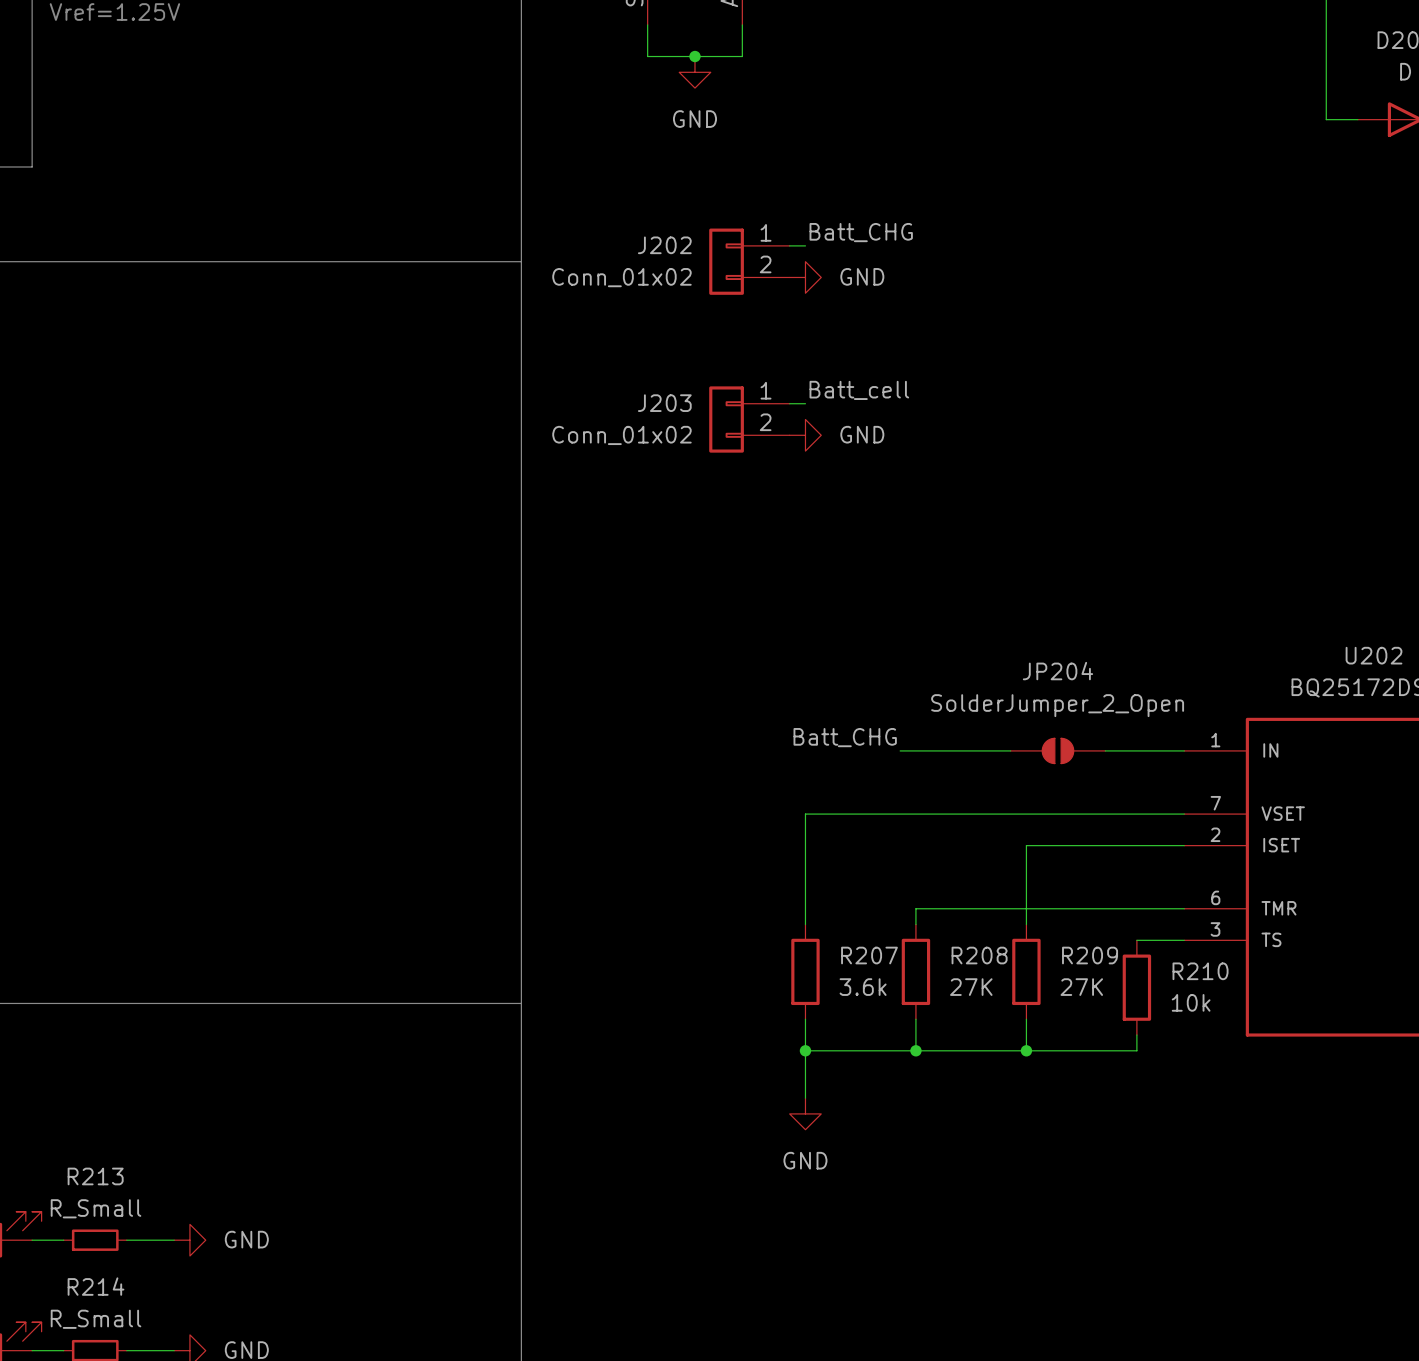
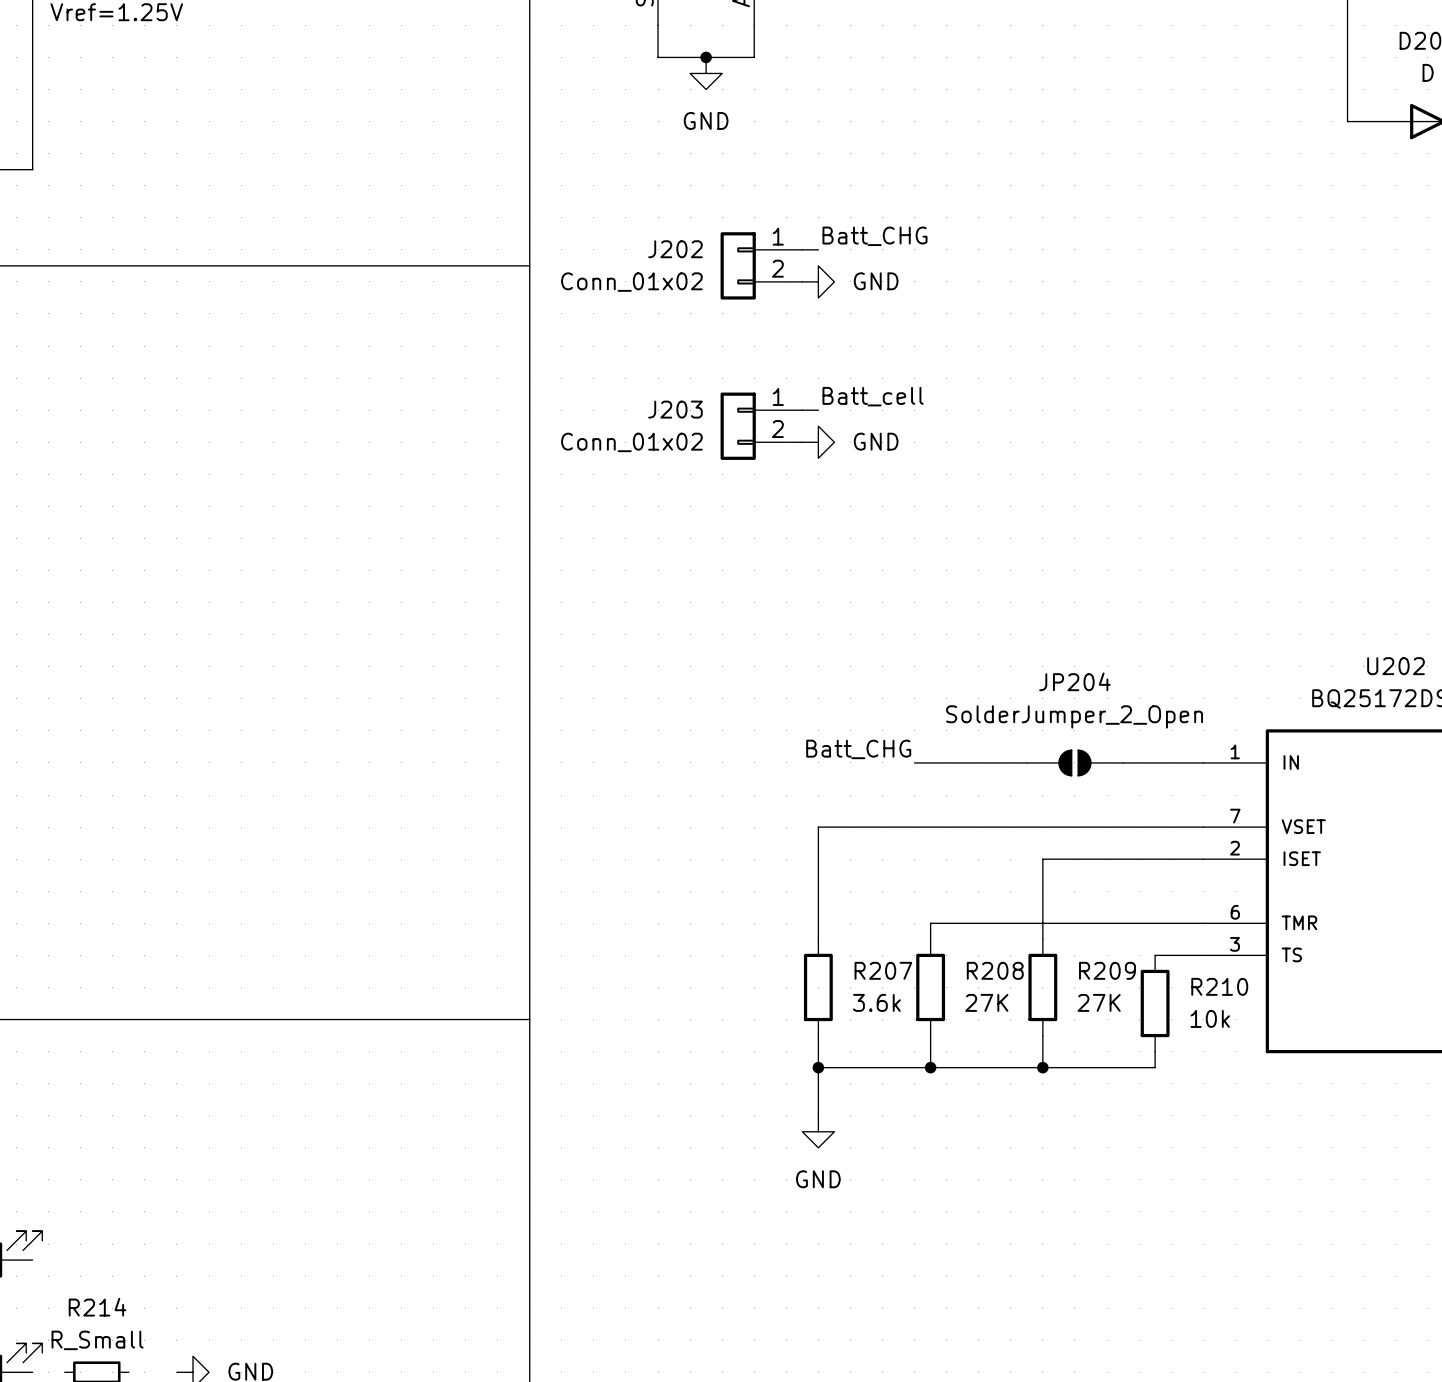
wire: (32, 1240) (63, 1240) -> none
R213: R_Small (95, 1240) -> none
wire: (126, 1240) (174, 1240) -> none
power symbol: GND (189, 1240) -> none
wire: (32, 1350) (63, 1350) -> none
wire: (126, 1350) (174, 1350) -> none

